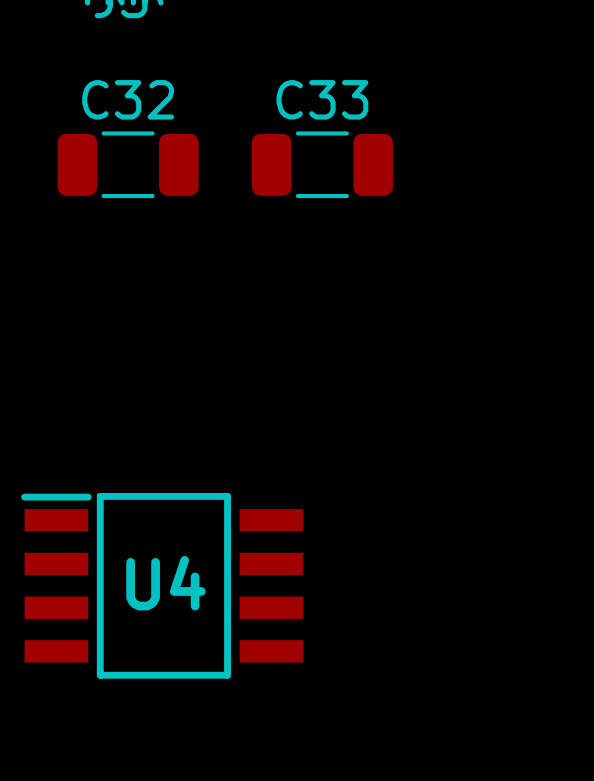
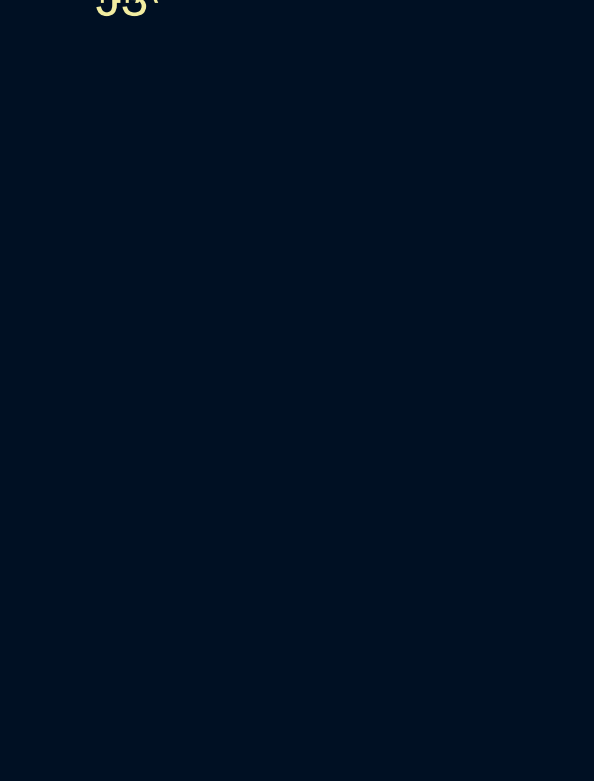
C32: (128, 164) -> none
C33: (322, 164) -> none
U4: (162, 585) -> none

